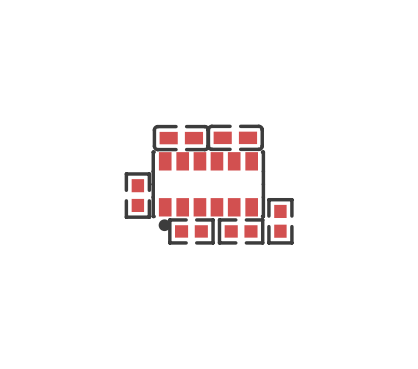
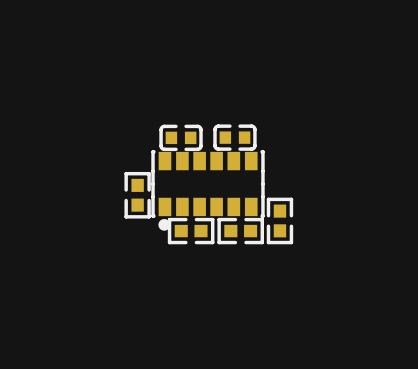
part footprint: [152, 124, 210, 152] -> [159, 124, 203, 152]
part footprint: [206, 124, 264, 152] -> [213, 124, 257, 151]

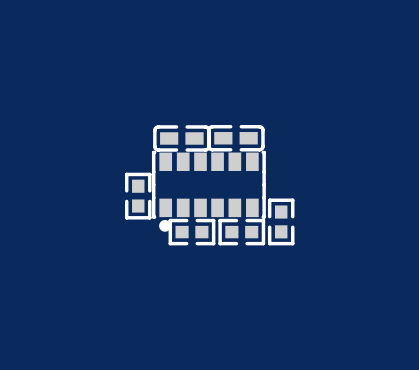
part footprint: [159, 124, 203, 152] -> [153, 125, 211, 152]
part footprint: [213, 124, 257, 151] -> [207, 124, 265, 152]

